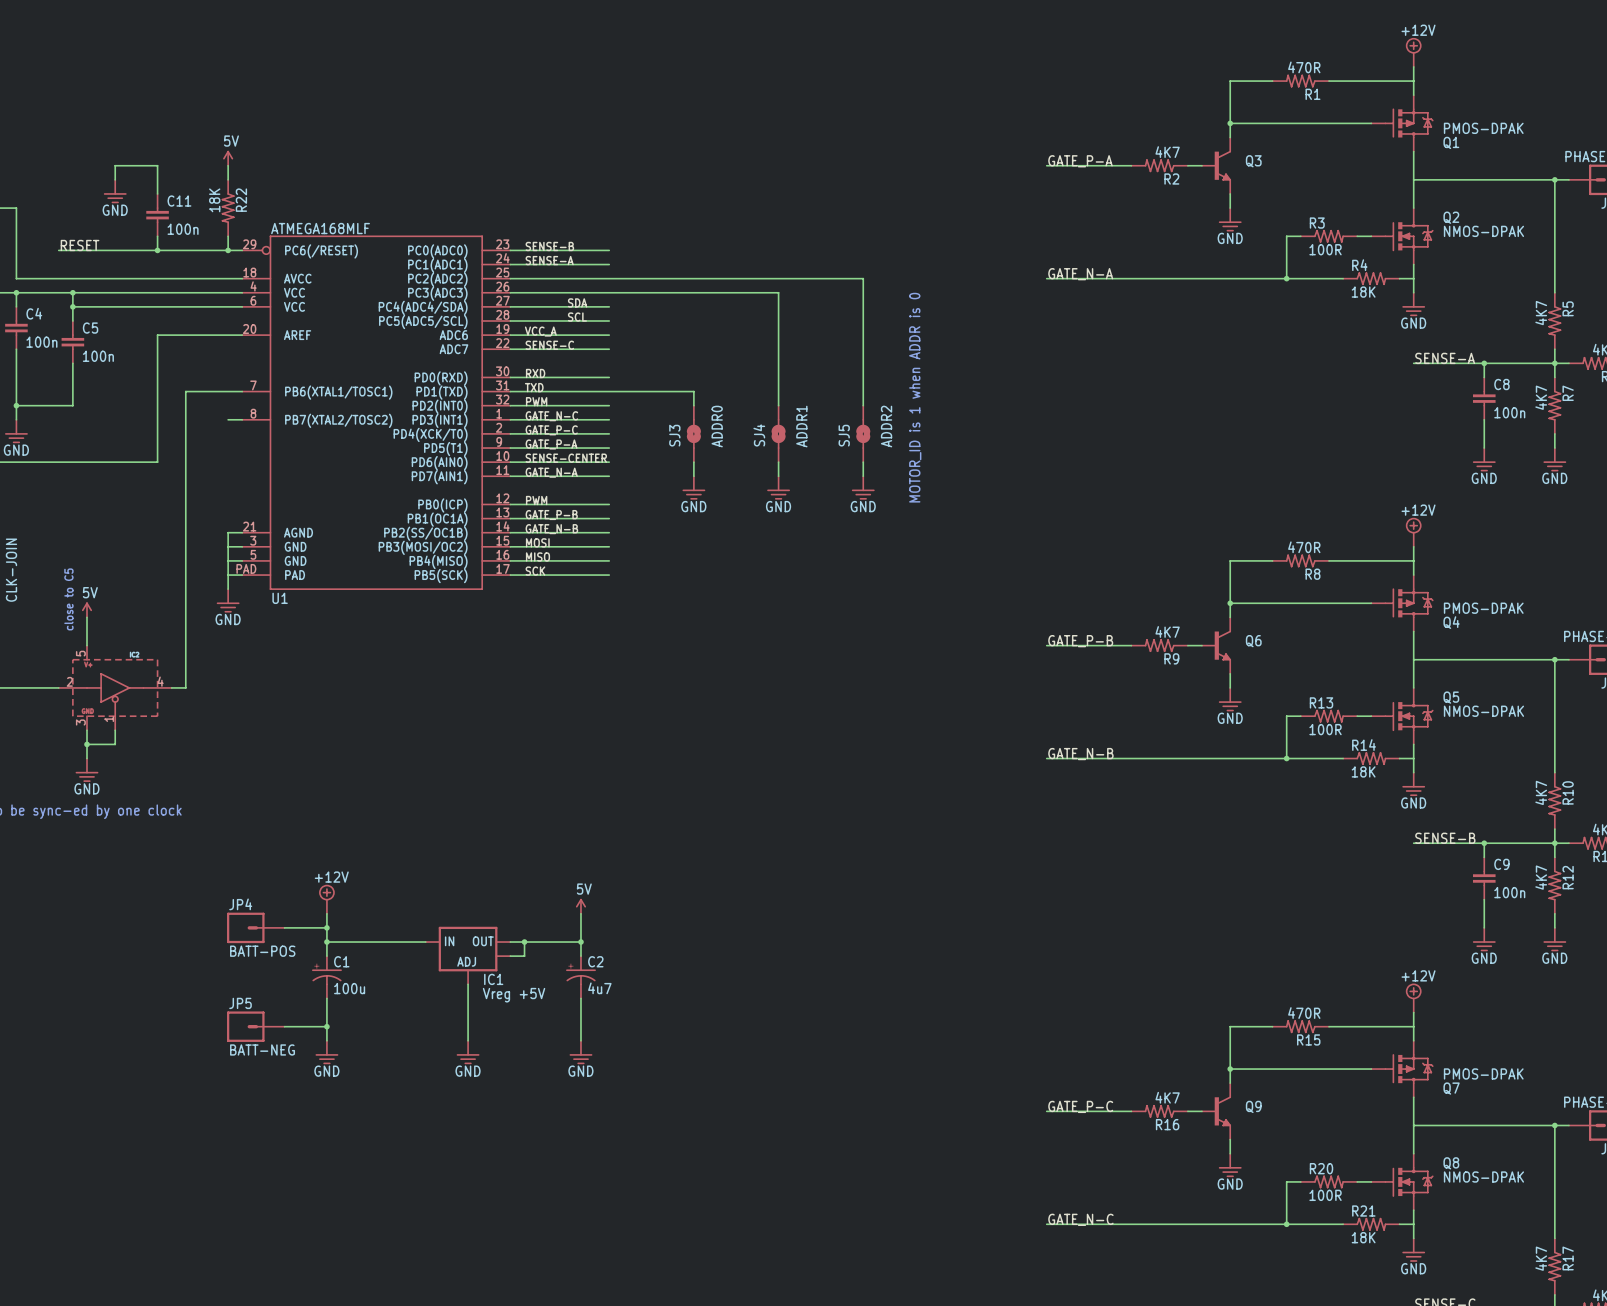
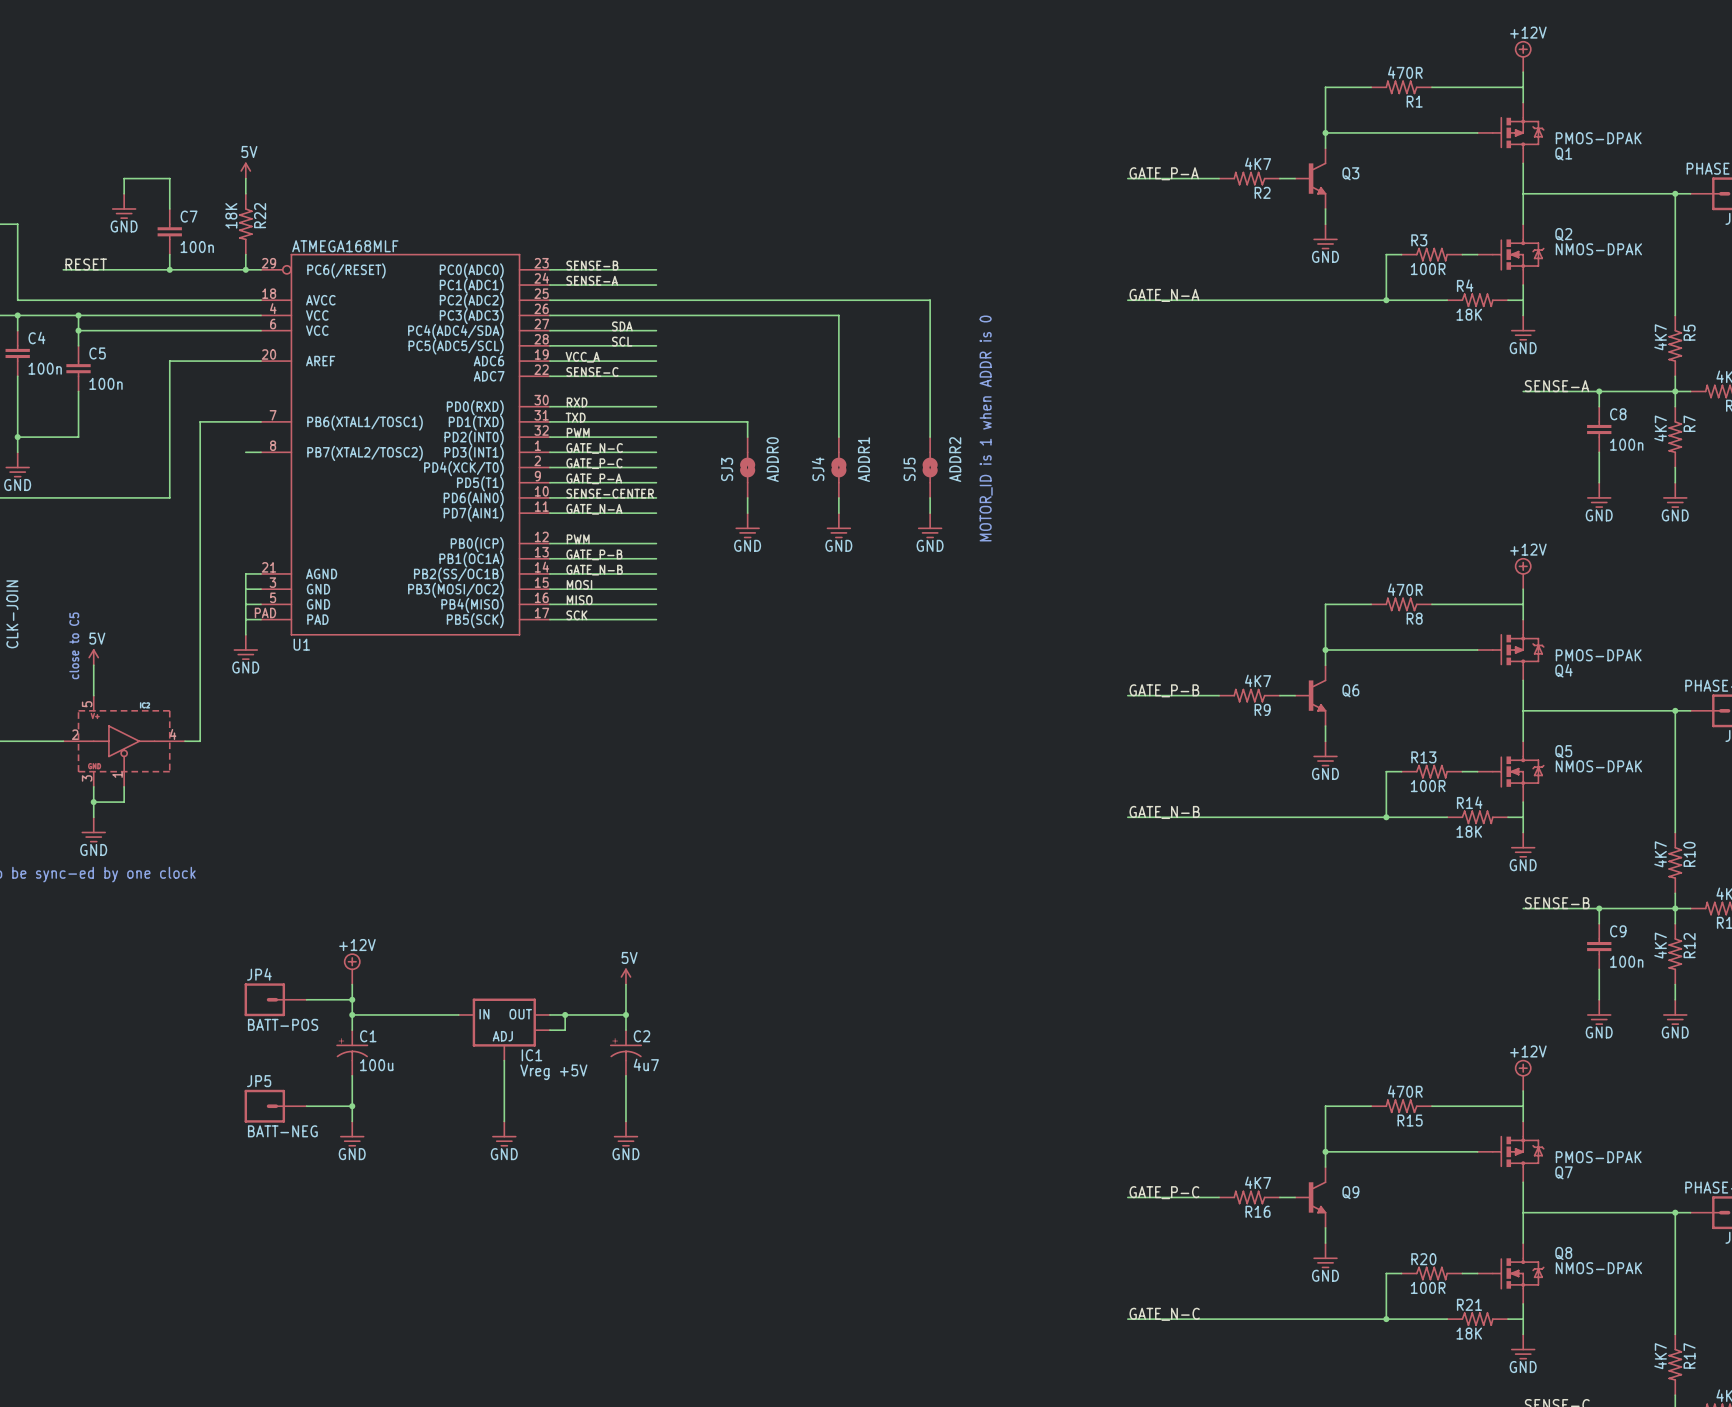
C11 name: C11 (179, 201) -> C7 (189, 216)

